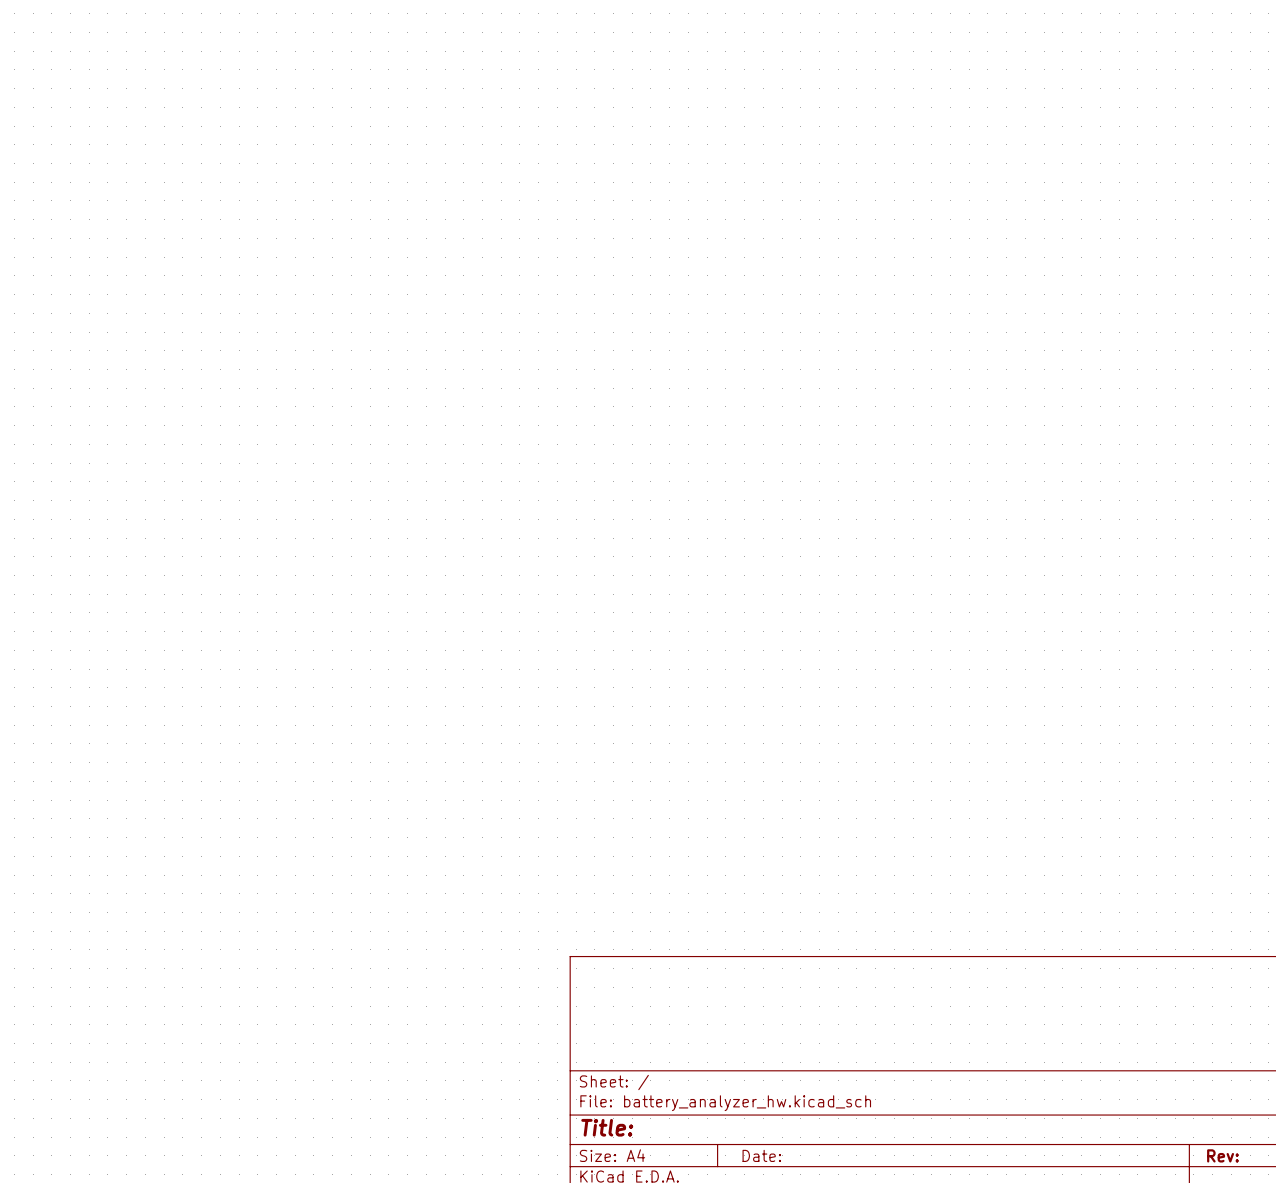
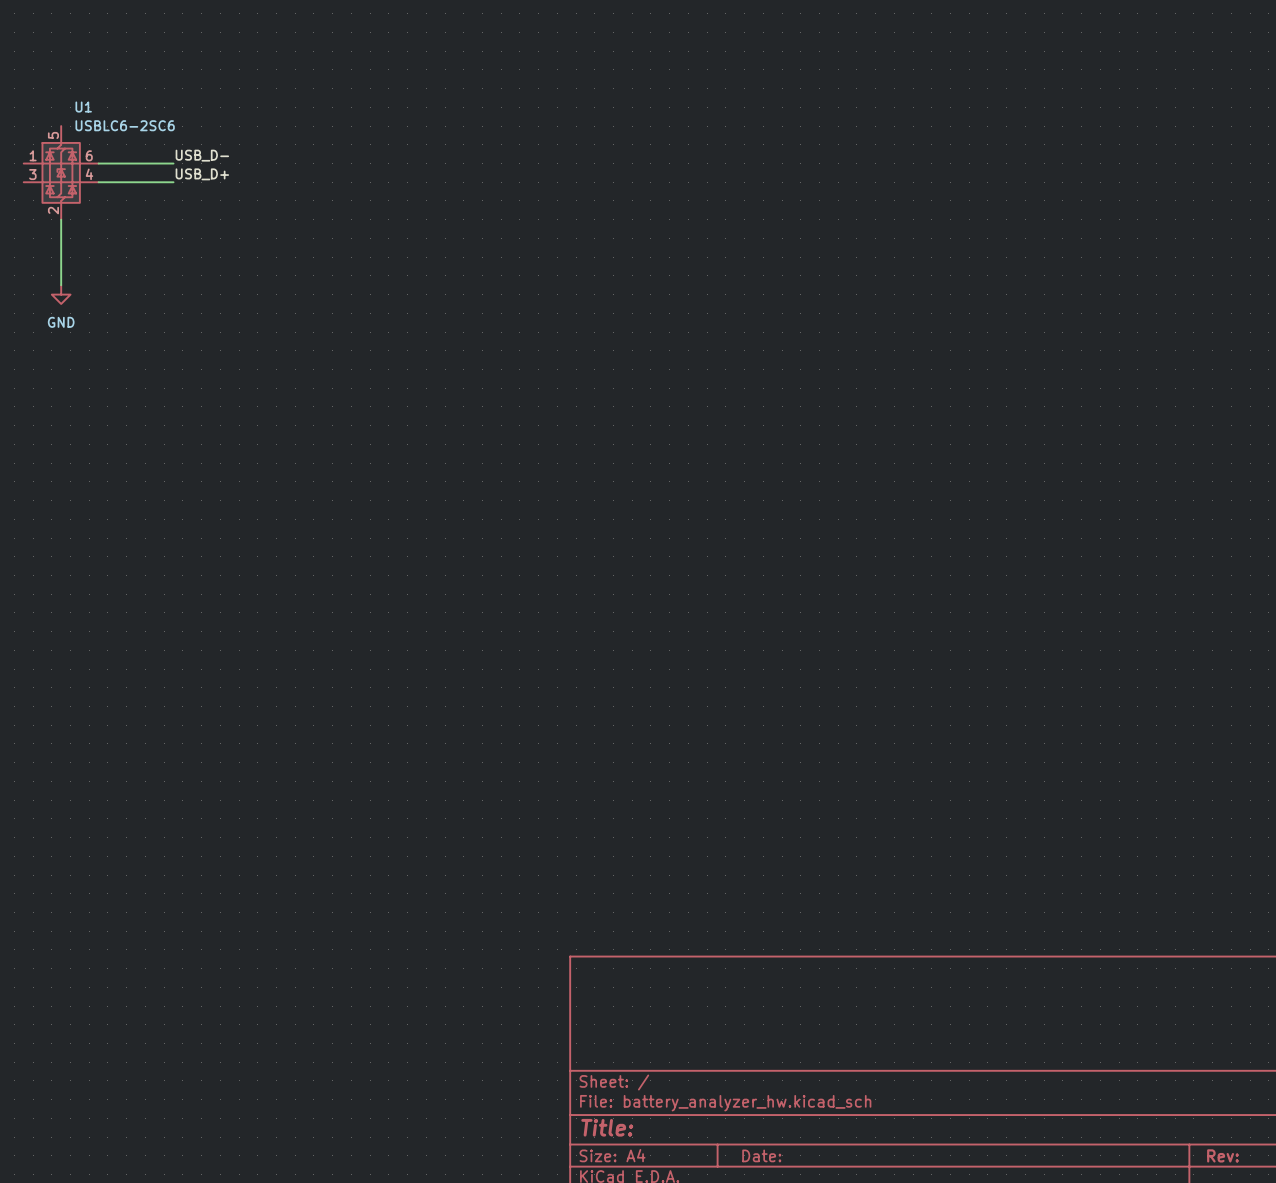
label: none -> USB_D- (202, 155)
wire: none -> (98, 163) (173, 163)
U1: none -> USBLC6-2SC6 (61, 172)
label: none -> USB_D+ (202, 174)
wire: none -> (98, 182) (173, 182)
wire: none -> (61, 219) (61, 285)
power symbol: none -> GND (61, 294)

